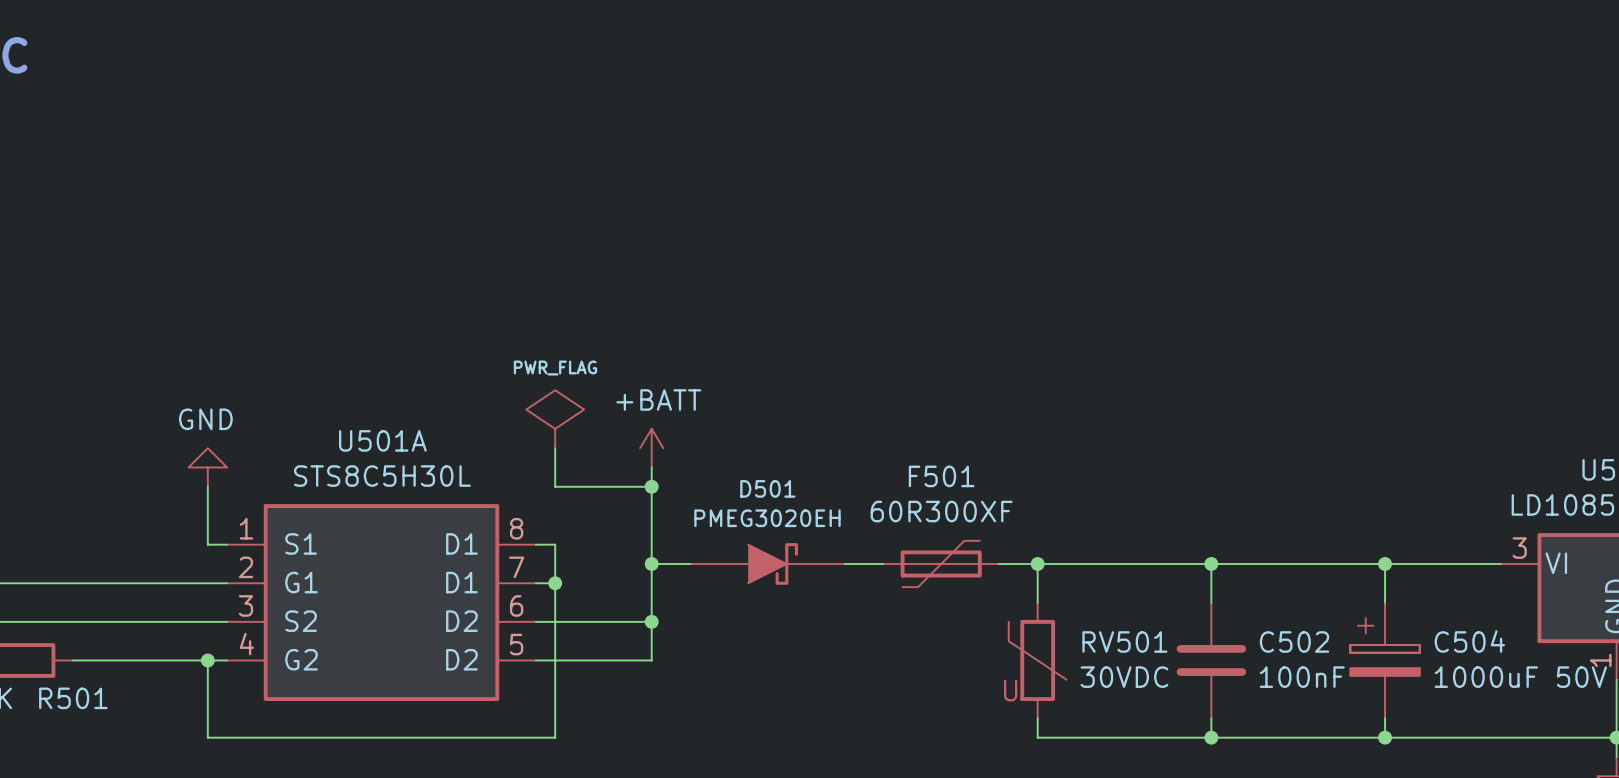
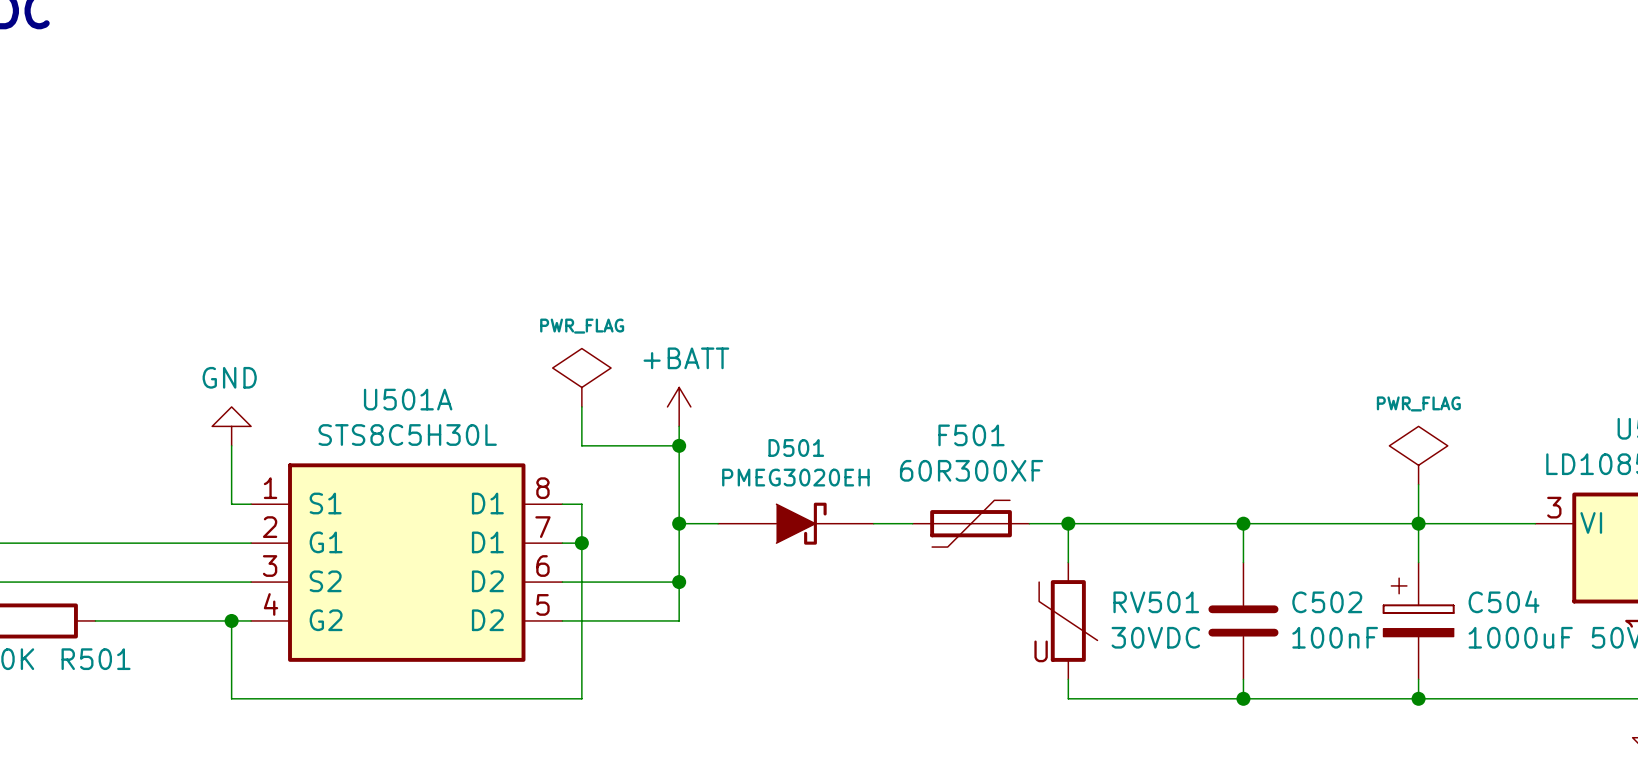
power symbol: none -> PWR_FLAG (1418, 455)
wire: none -> (1418, 484) (1418, 523)

